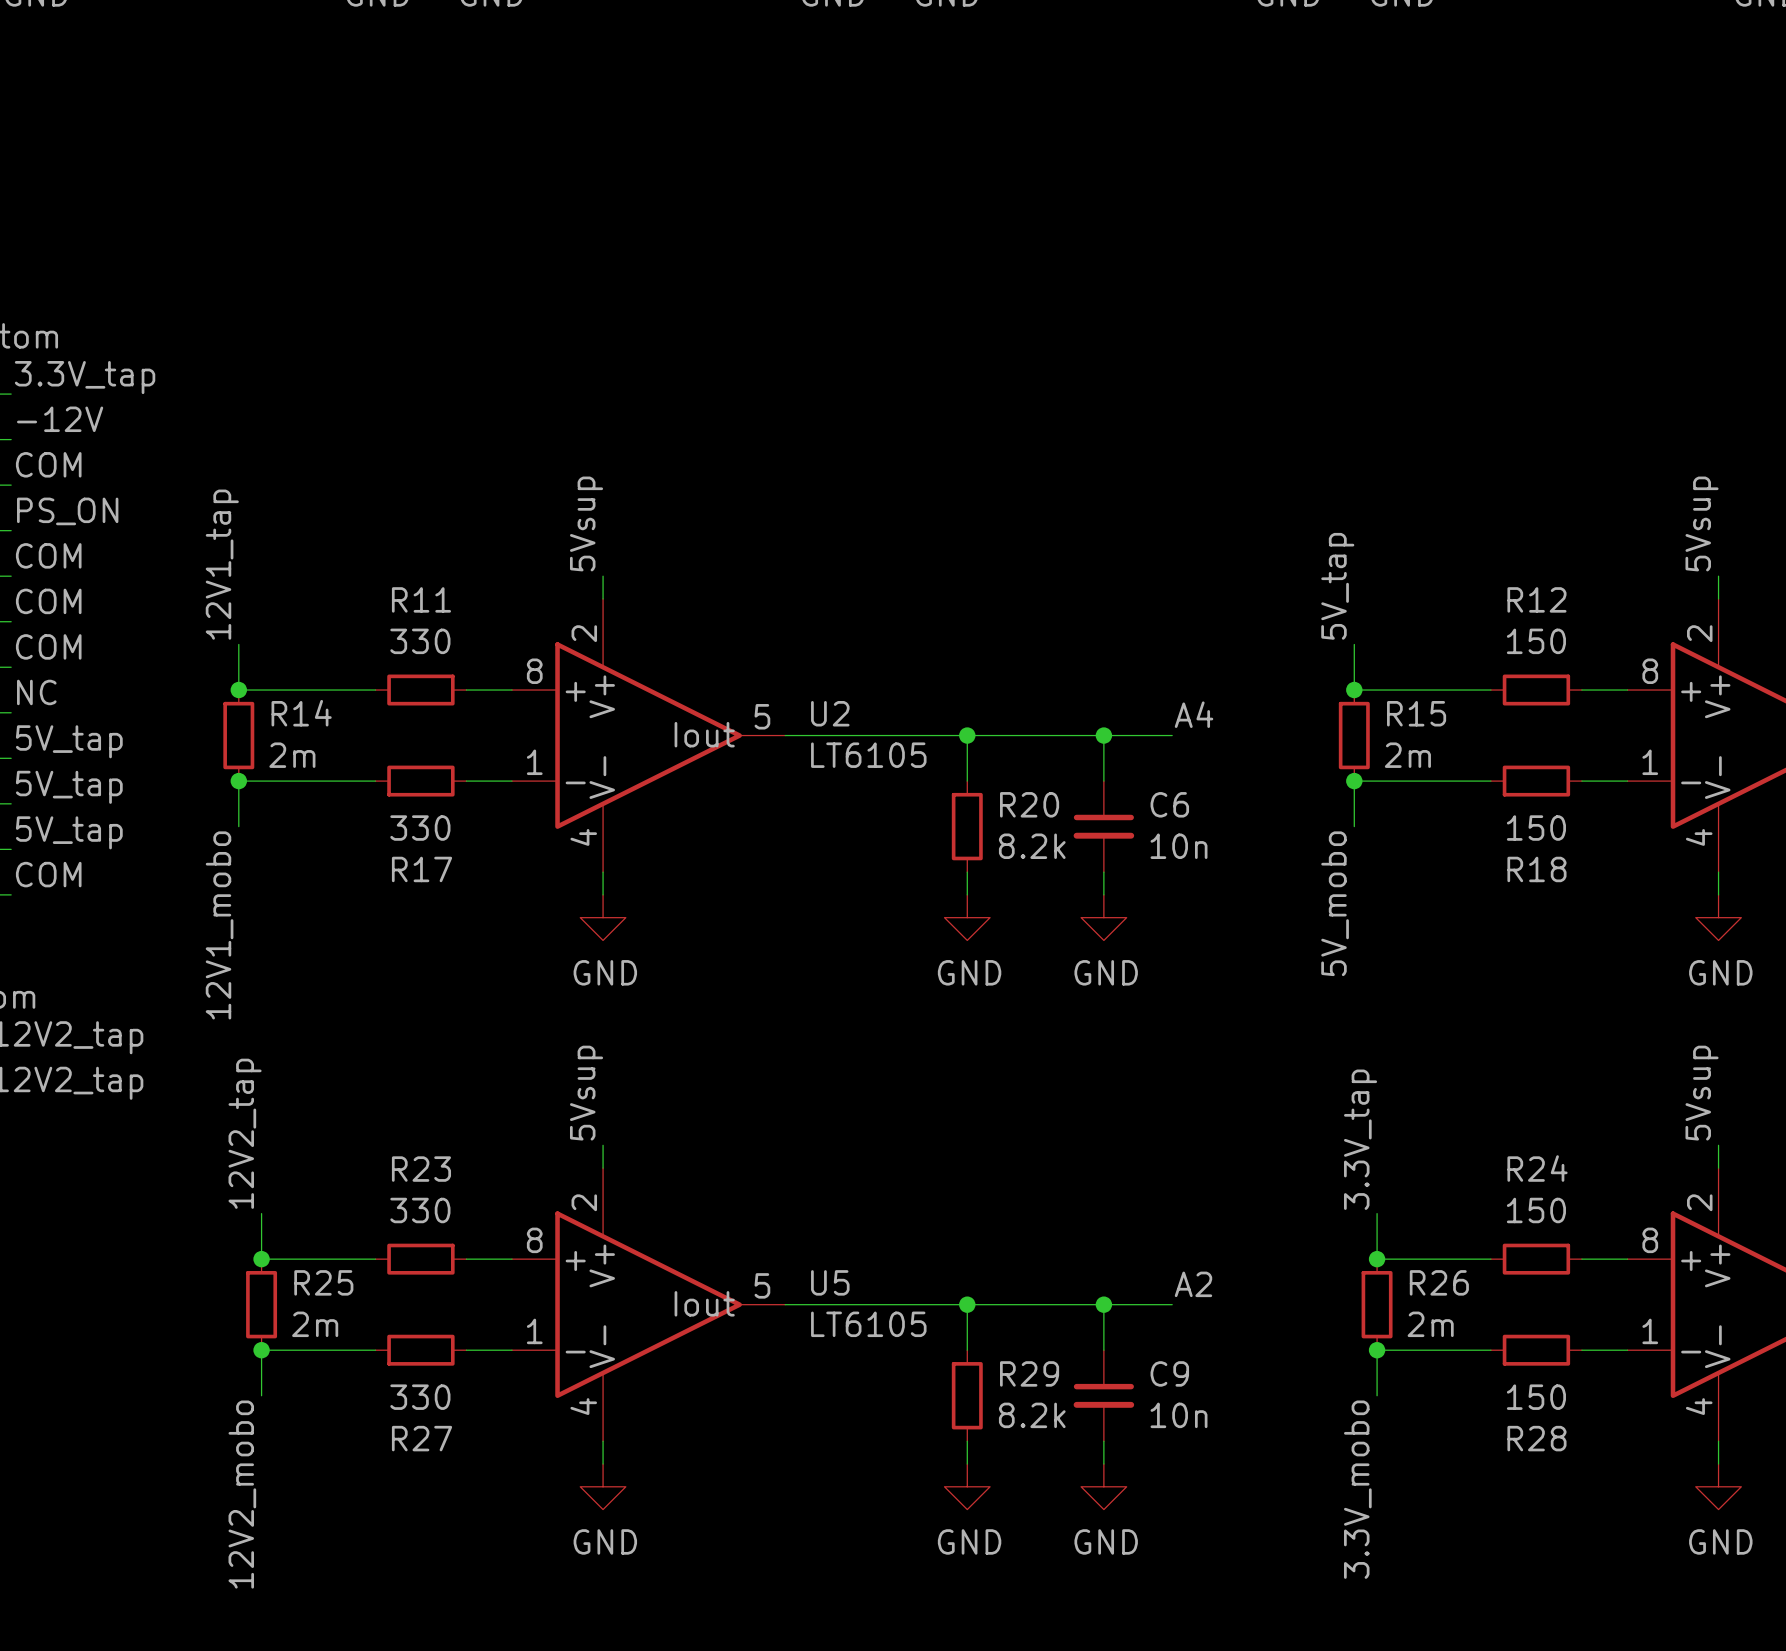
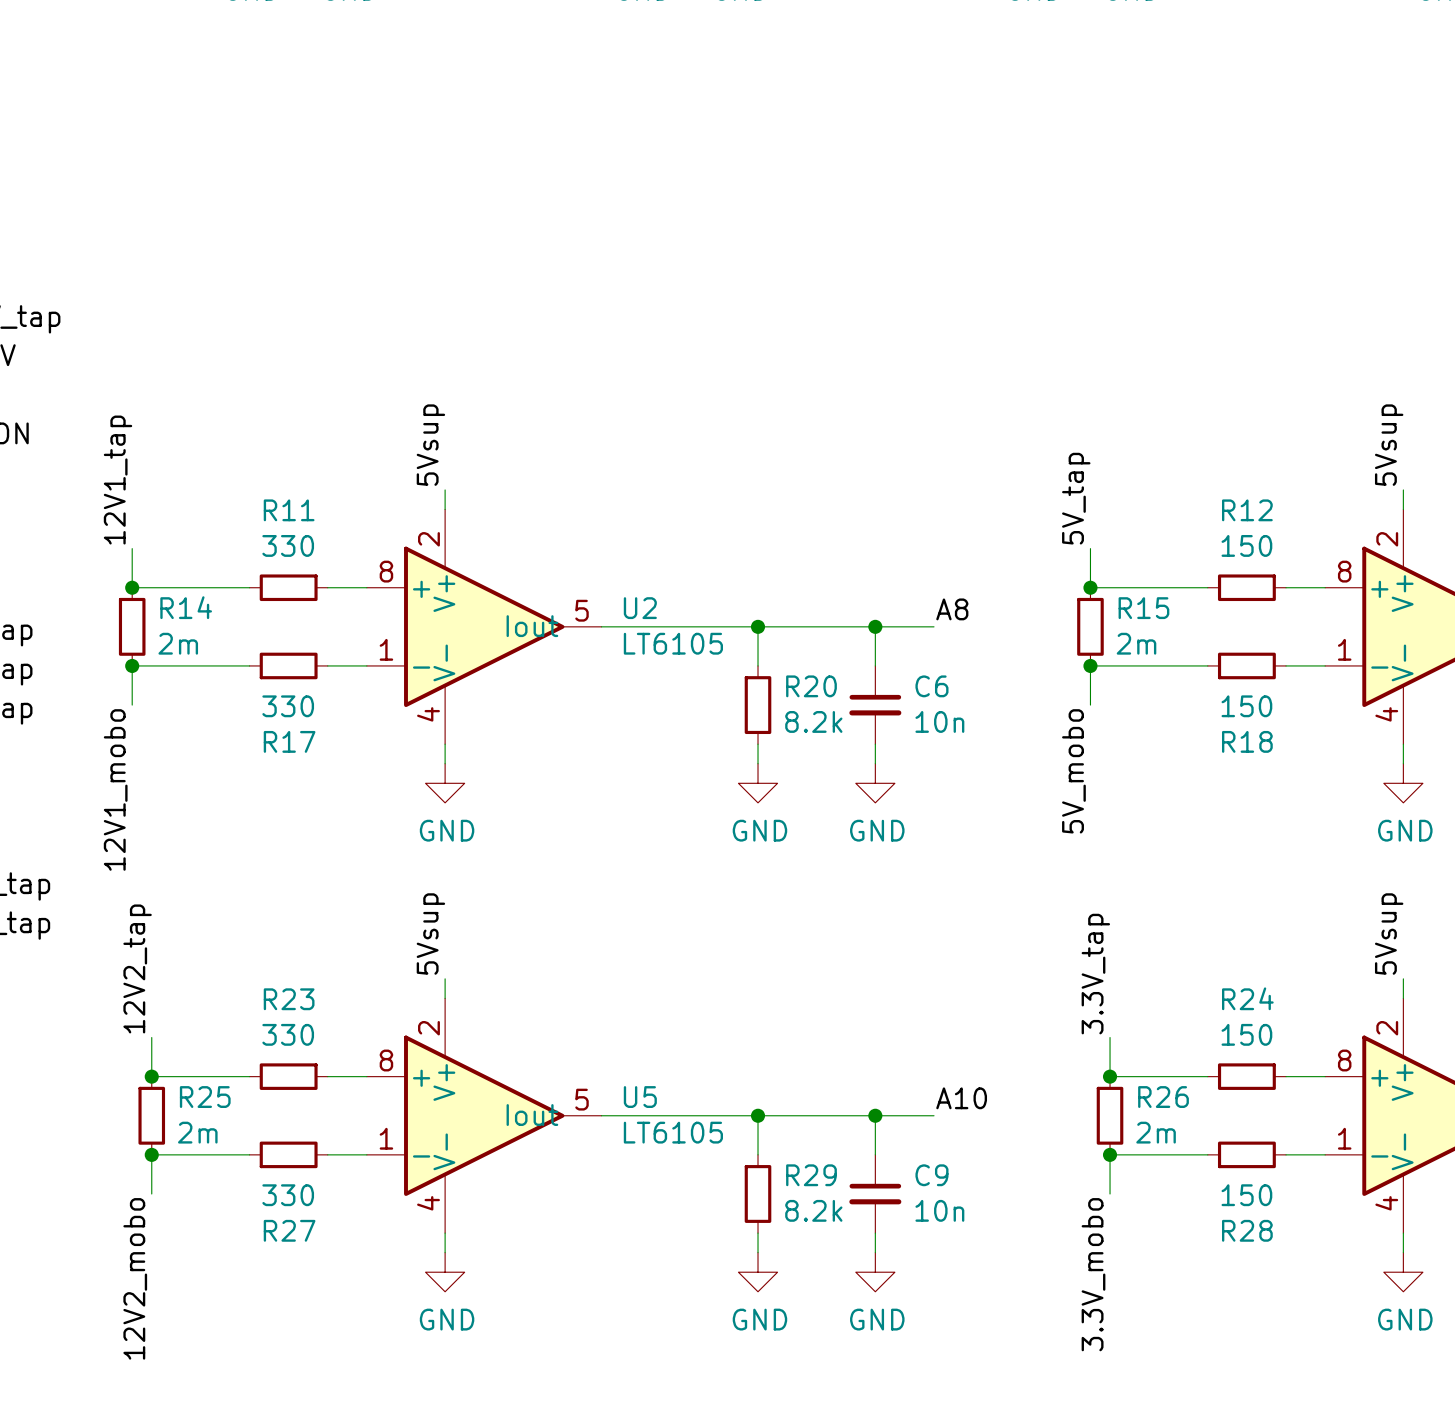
label: A4 (1194, 714) -> A8 (952, 609)
label: A2 (1193, 1284) -> A10 (961, 1098)

